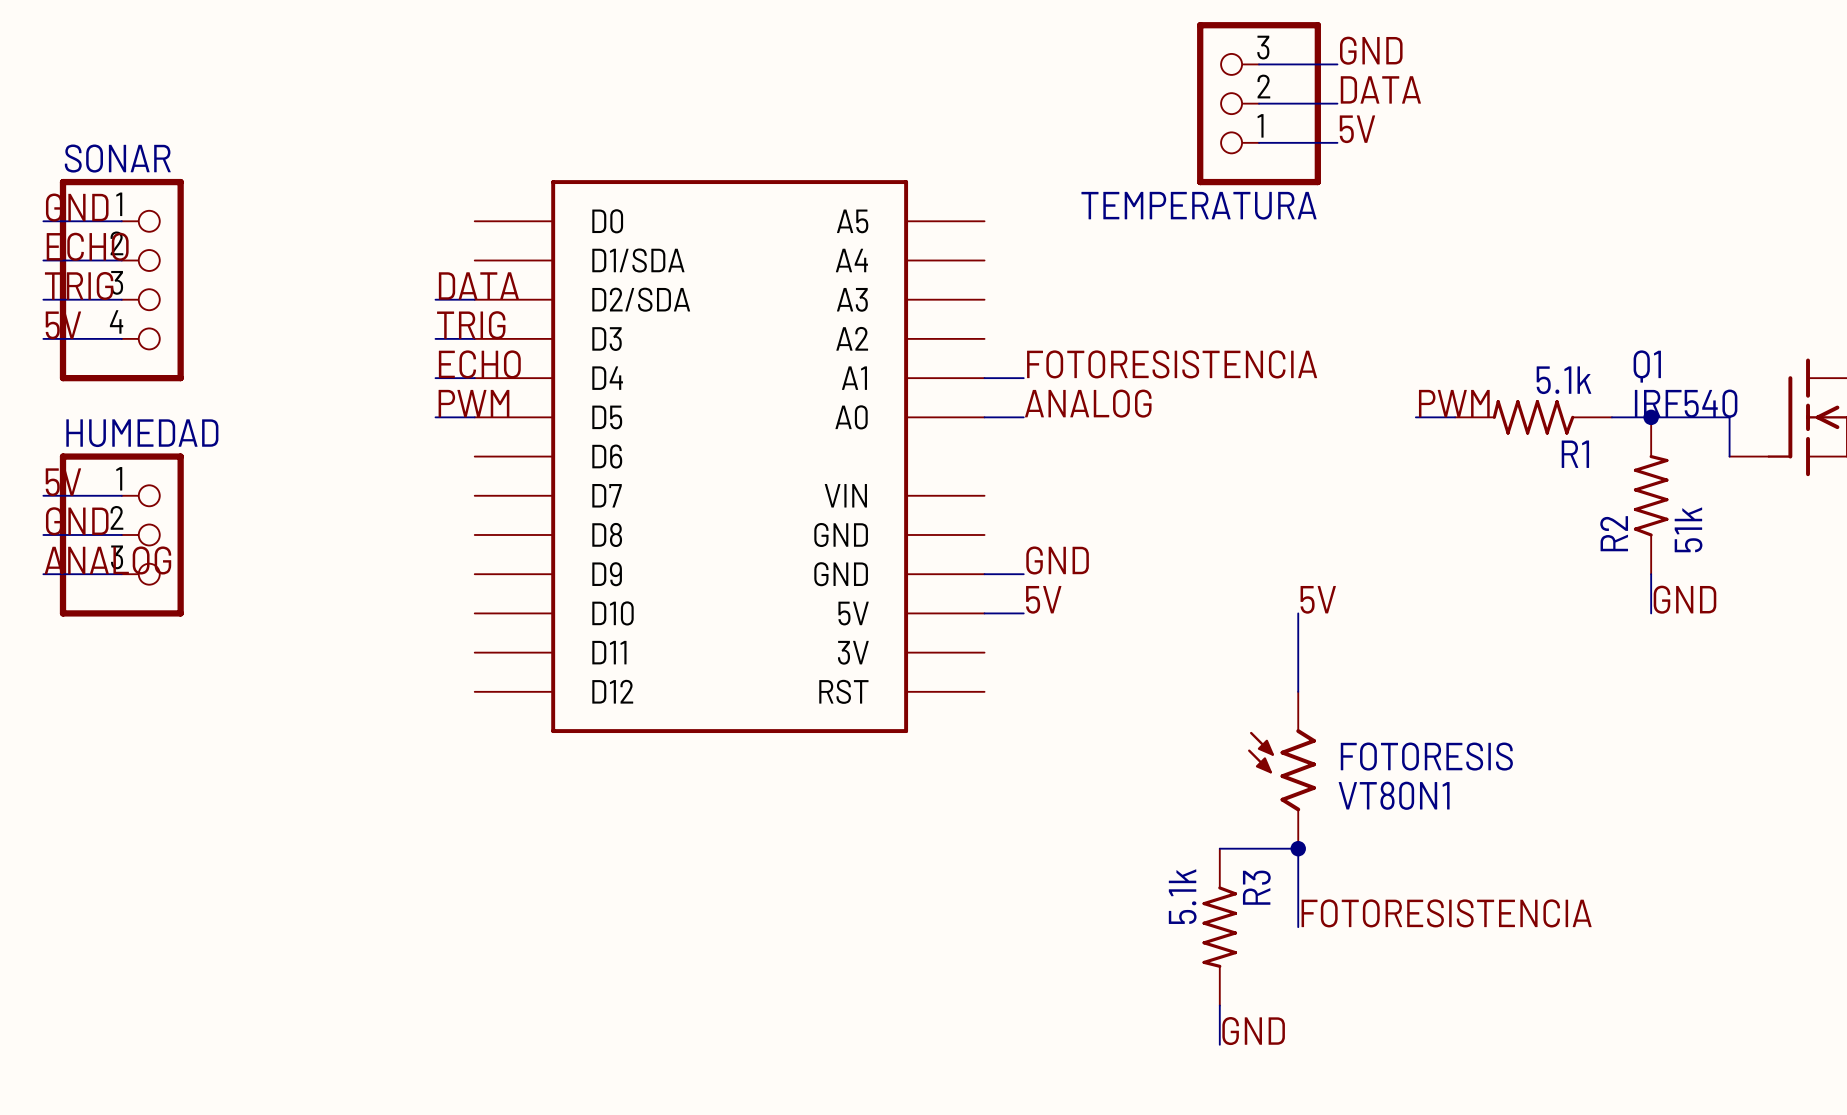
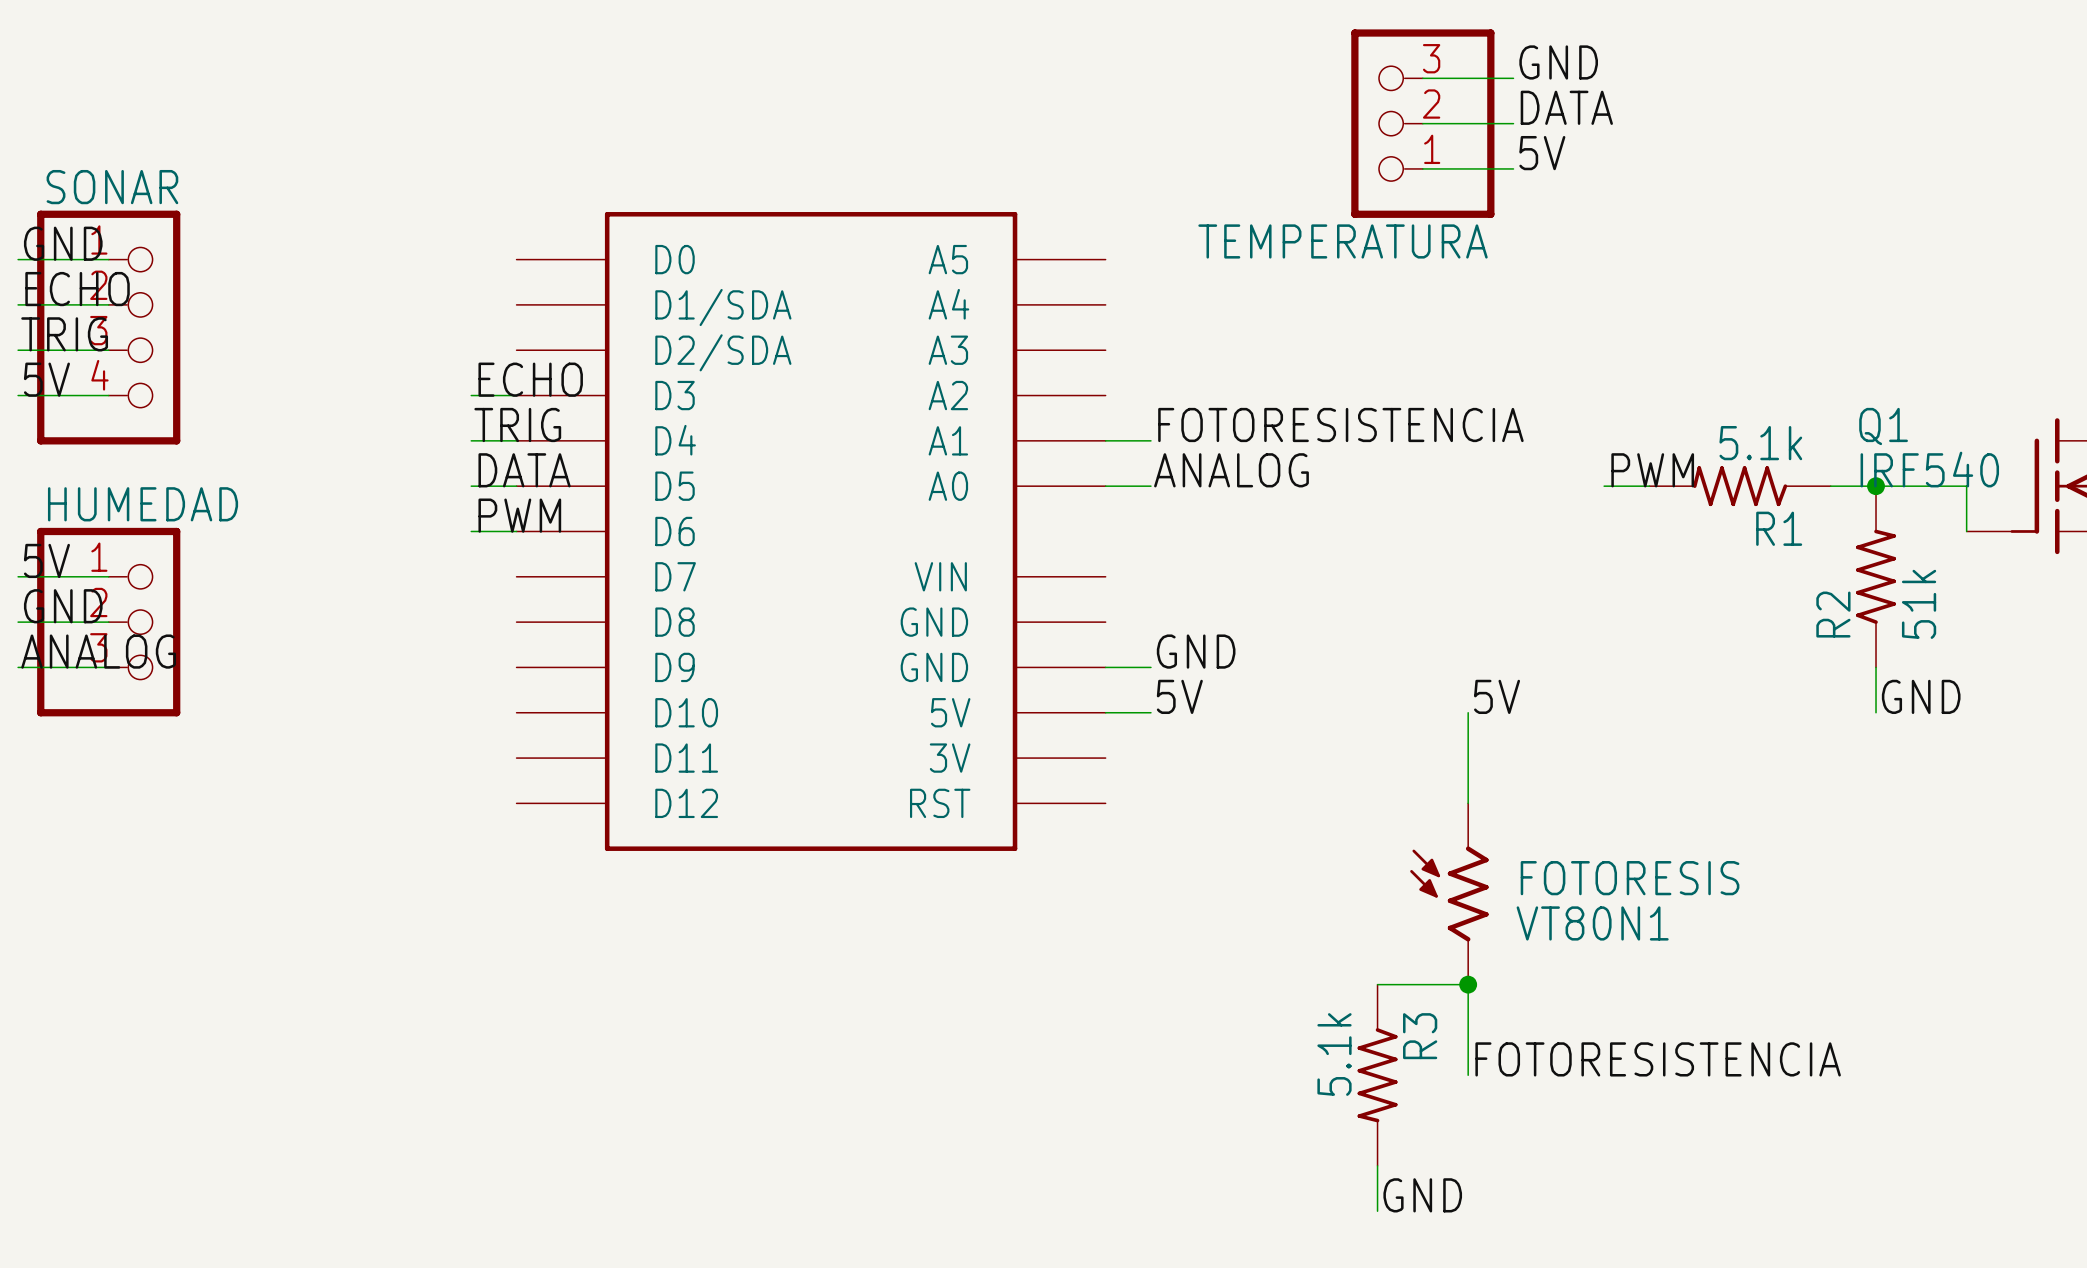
label: DATA (478, 285) -> none
wire: (435, 299) (474, 299) -> (471, 531) (516, 531)
label: TRIG (471, 325) -> ECHO (530, 379)
label: ECHO (479, 364) -> TRIG (517, 424)
label: PWM (473, 403) -> DATA (524, 470)
label: none -> PWM (519, 515)

